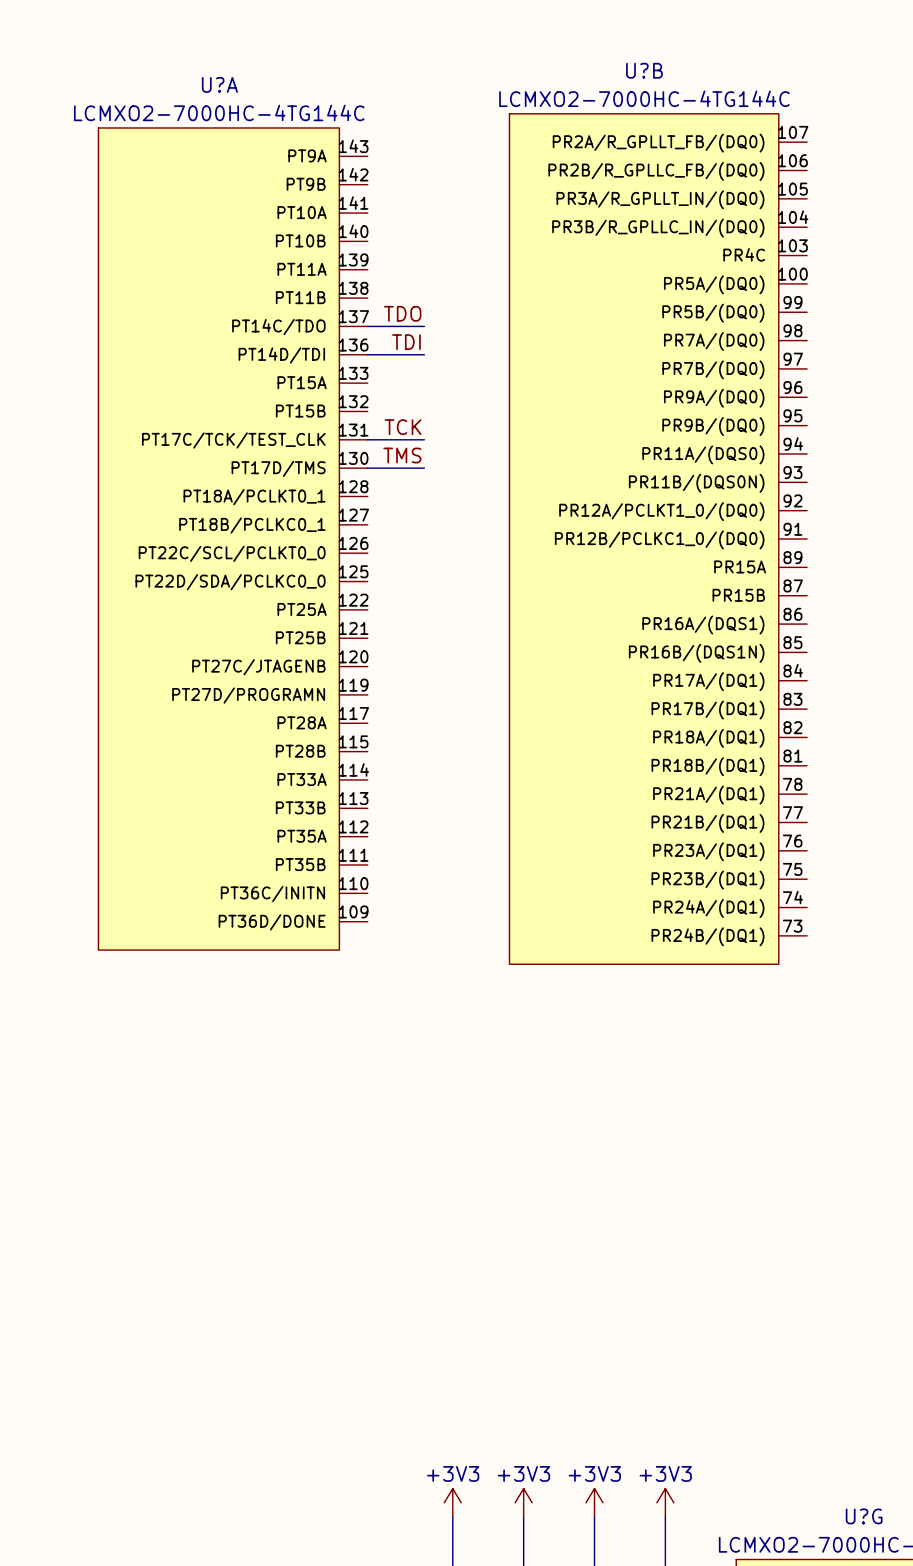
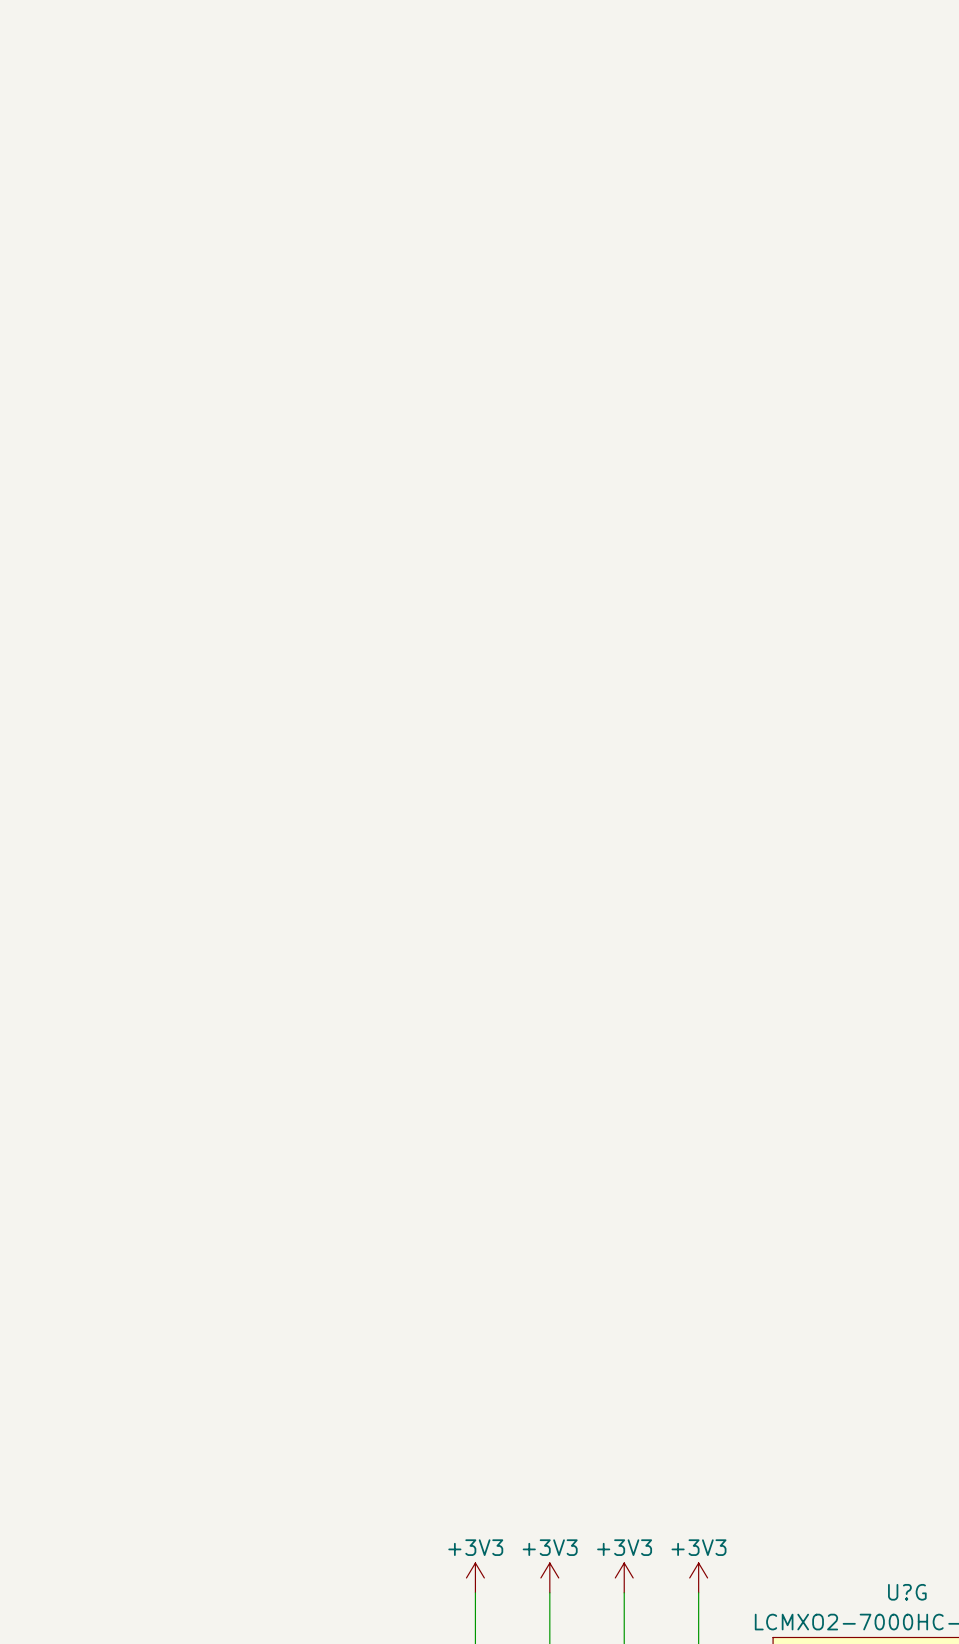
label: TDO (402, 313) -> none
wire: (367, 326) (424, 326) -> none
label: TDI (406, 342) -> none
wire: (367, 354) (424, 354) -> none
label: TCK (403, 427) -> none
wire: (367, 439) (424, 439) -> none
label: TMS (402, 455) -> none
wire: (367, 468) (424, 468) -> none
U?A: LCMXO2-7000HC-4TG144C (233, 539) -> none
U?B: LCMXO2-7000HC-4TG144C (658, 539) -> none

